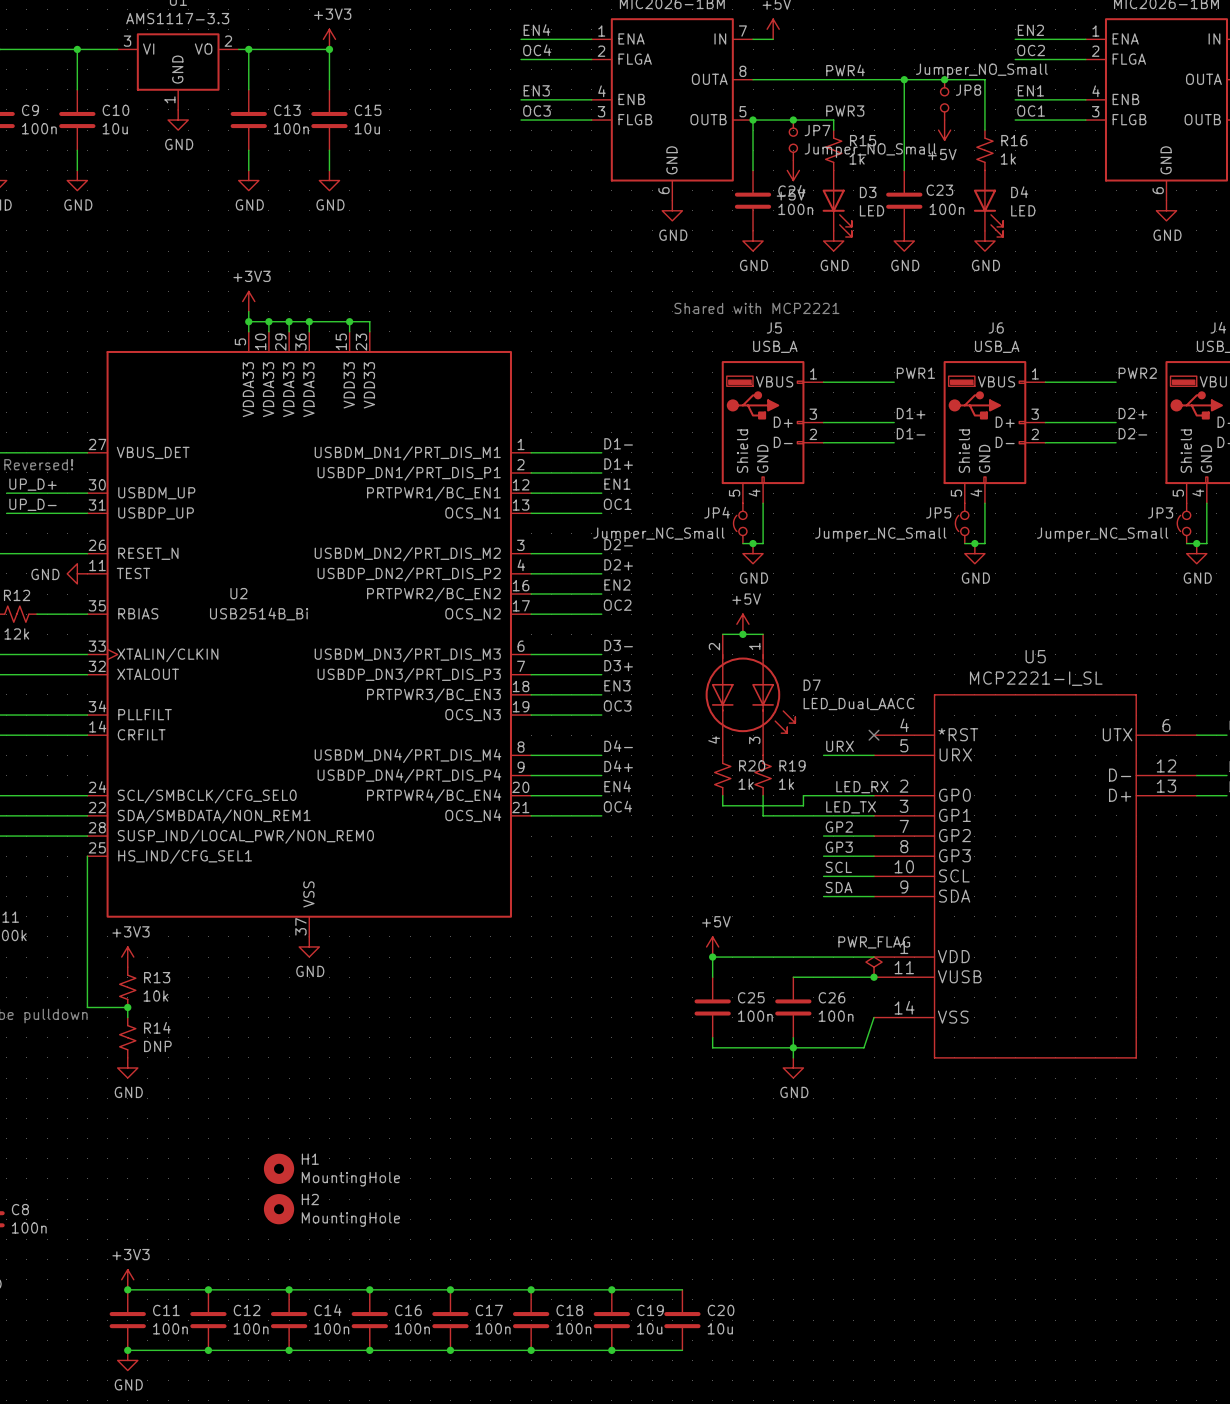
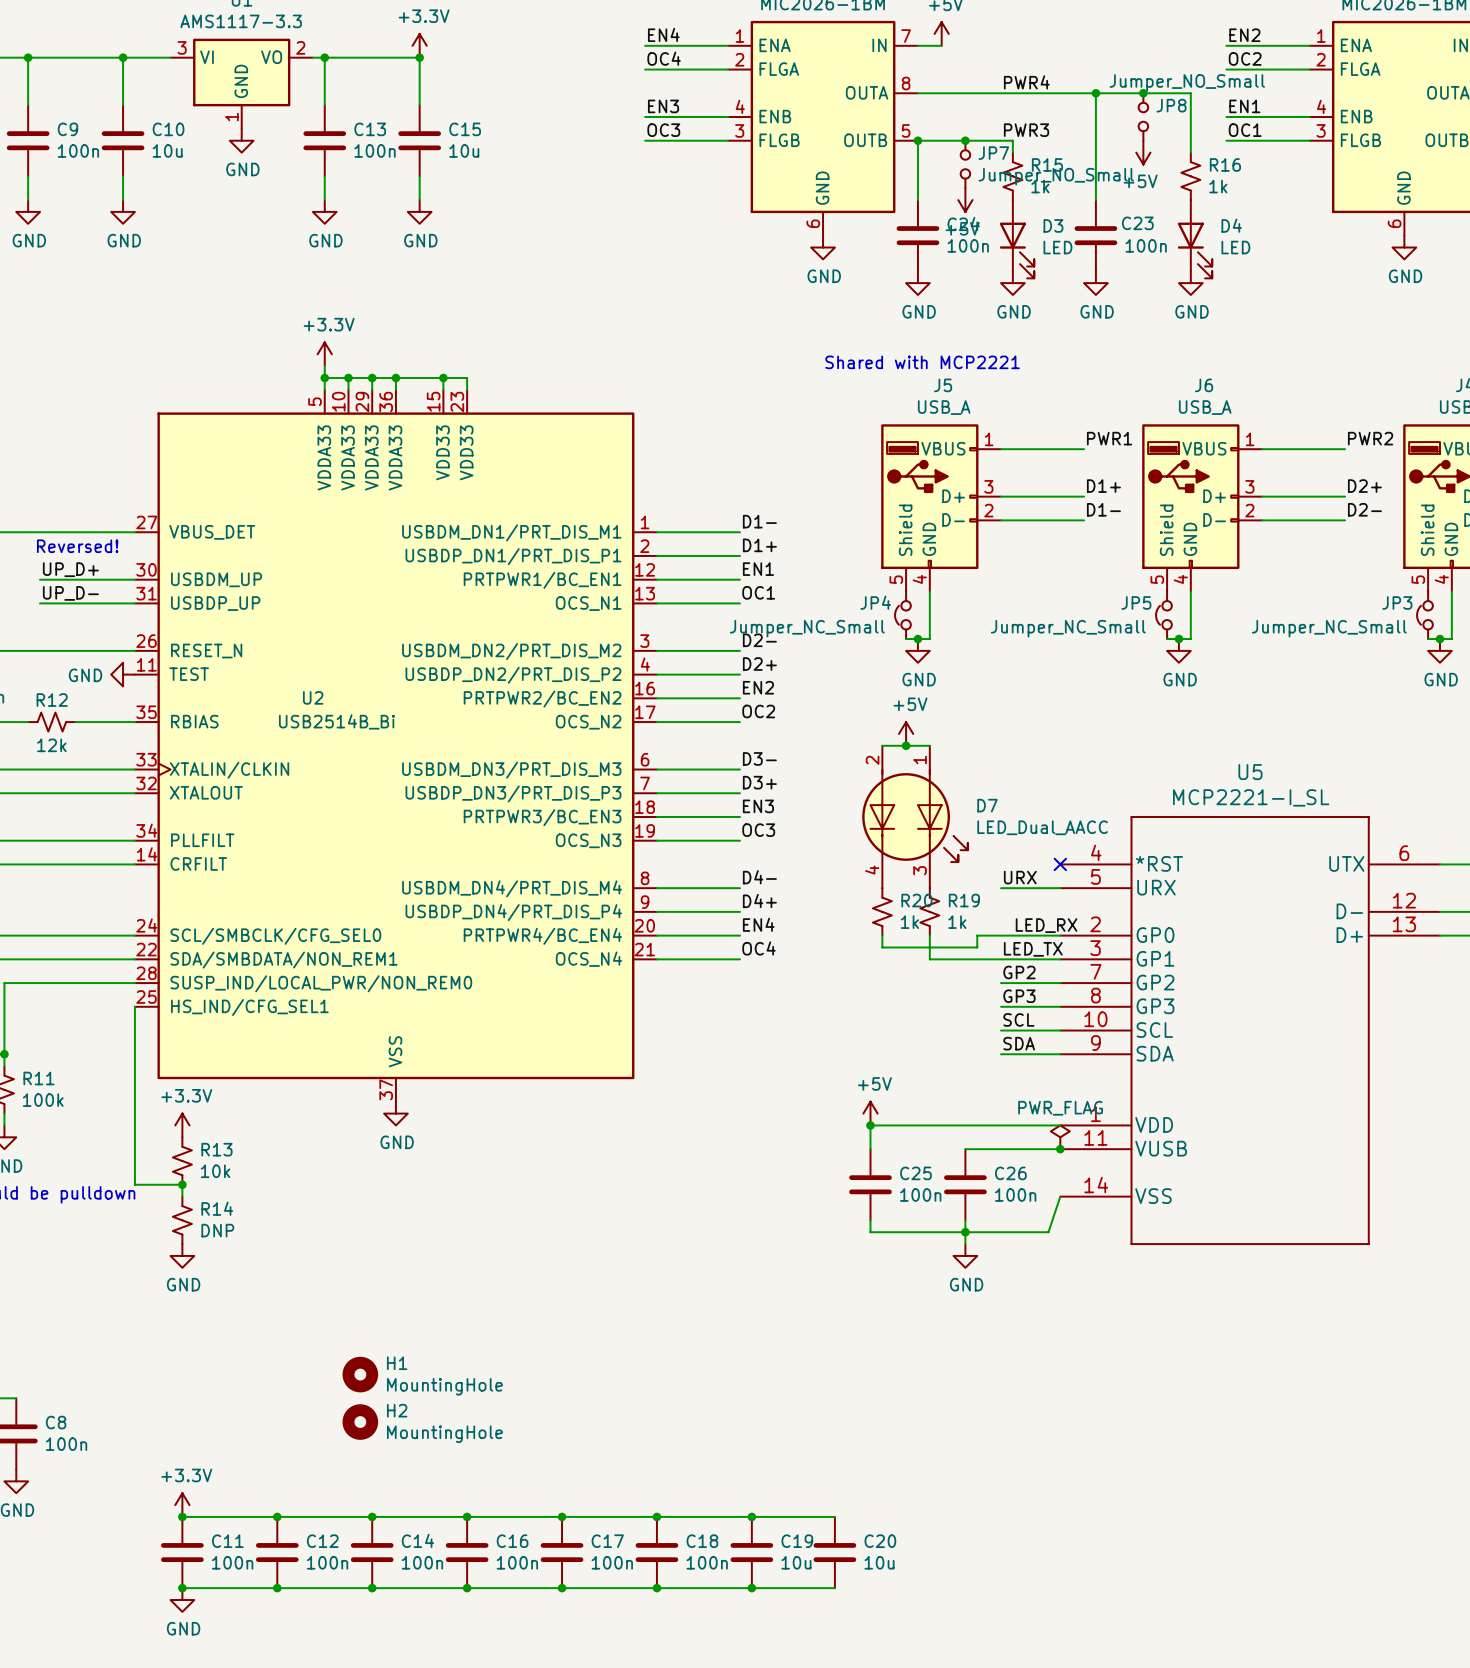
power symbol: +3V3 (329, 39) -> +3.3V (419, 45)
power symbol: +3V3 (248, 301) -> +3.3V (324, 354)
power symbol: +3V3 (127, 957) -> +3.3V (182, 1125)
power symbol: +3V3 (127, 1279) -> +3.3V (182, 1505)

